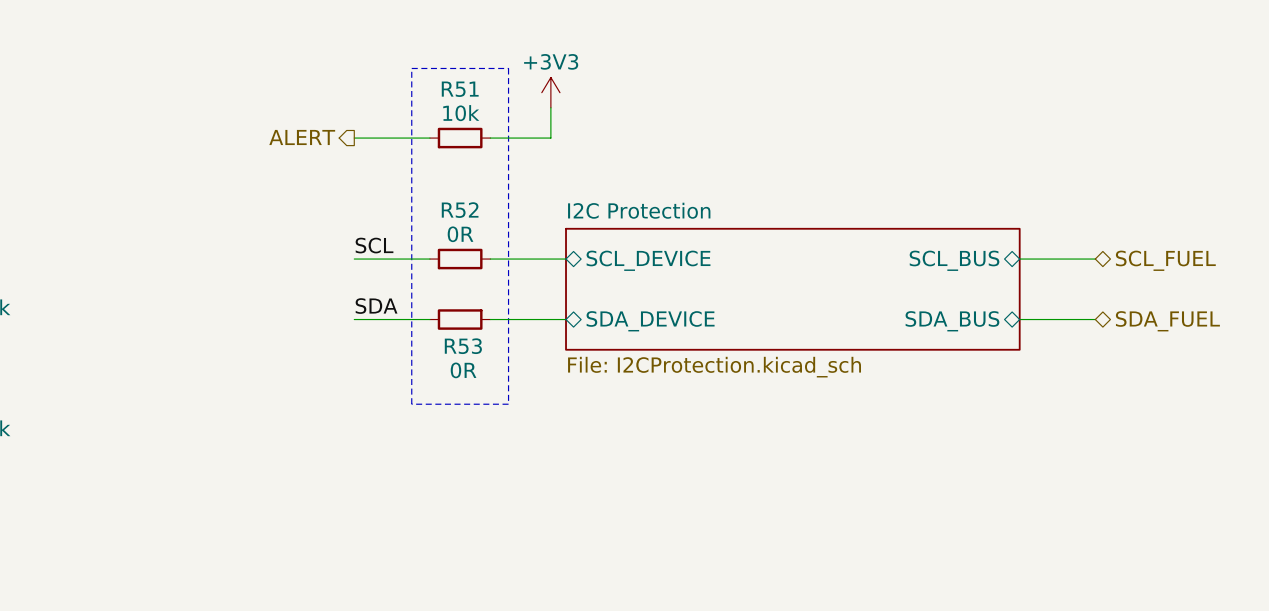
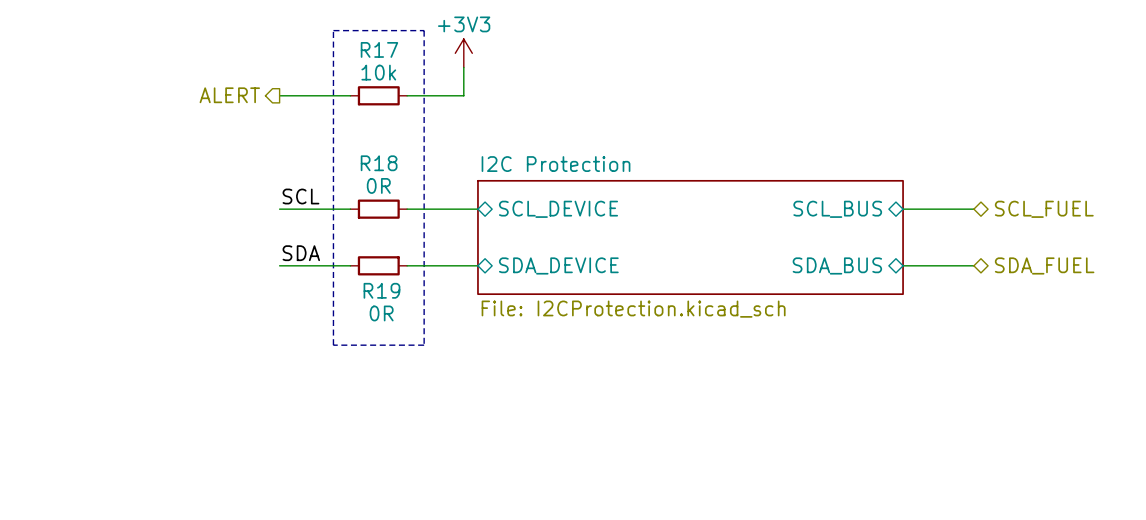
R51 name: R51 (460, 89) -> R17 (379, 49)
R52 name: R52 (460, 210) -> R18 (379, 163)
R53 name: R53 (463, 346) -> R19 (381, 290)

